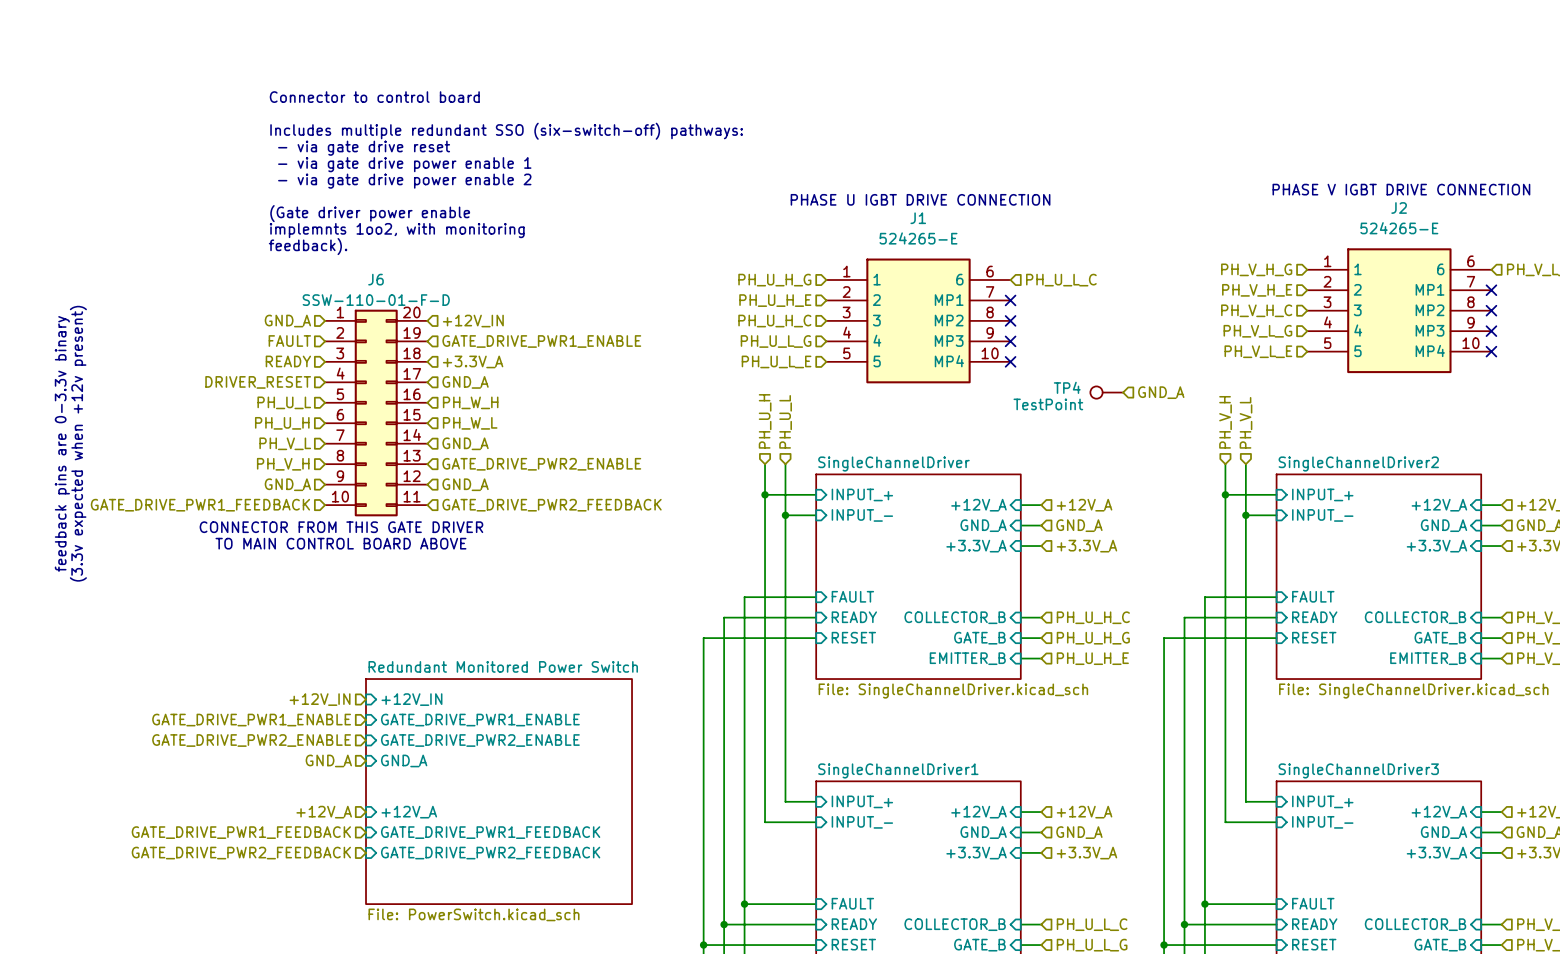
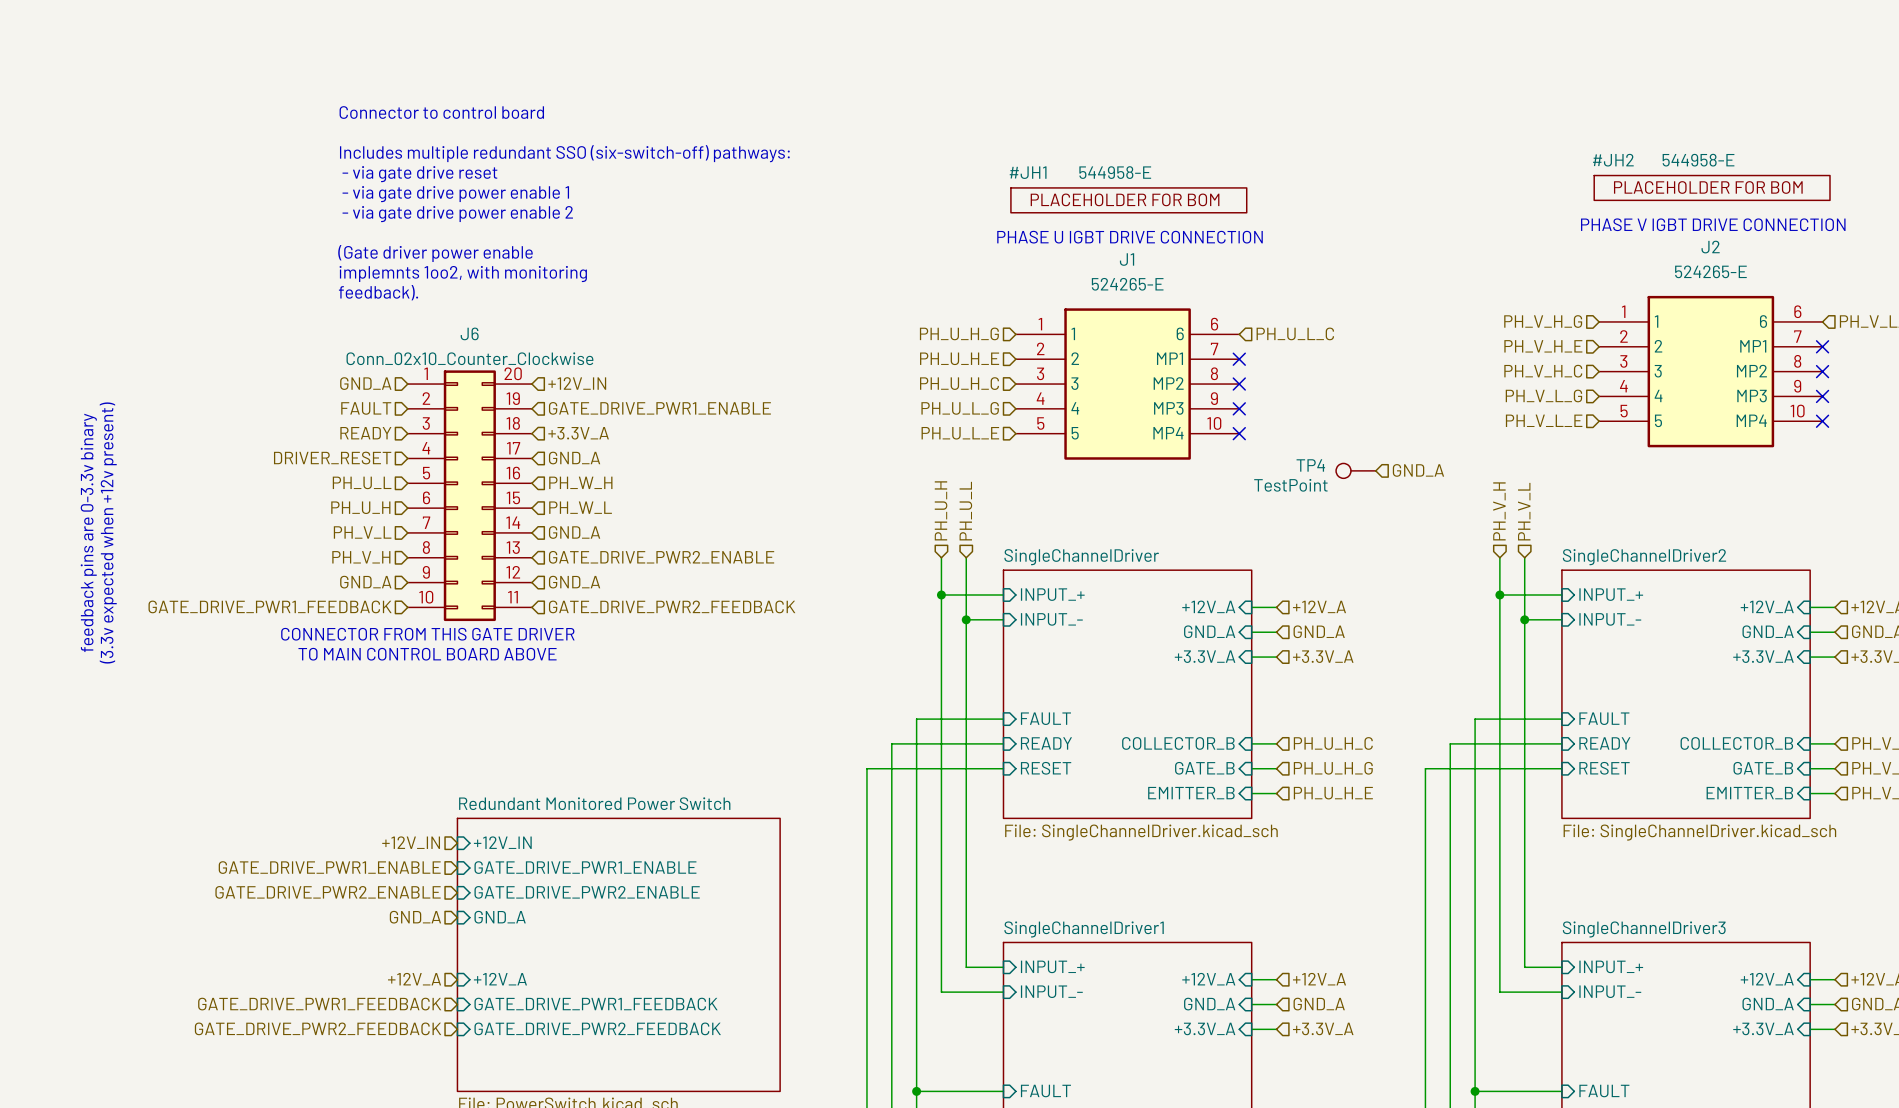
#JH2: none -> 544958-E (1712, 187)
#JH1: none -> 544958-E (1128, 200)
J6 value: SSW-110-01-F-D (376, 300) -> Conn_02x10_Counter_Clockwise (469, 358)

